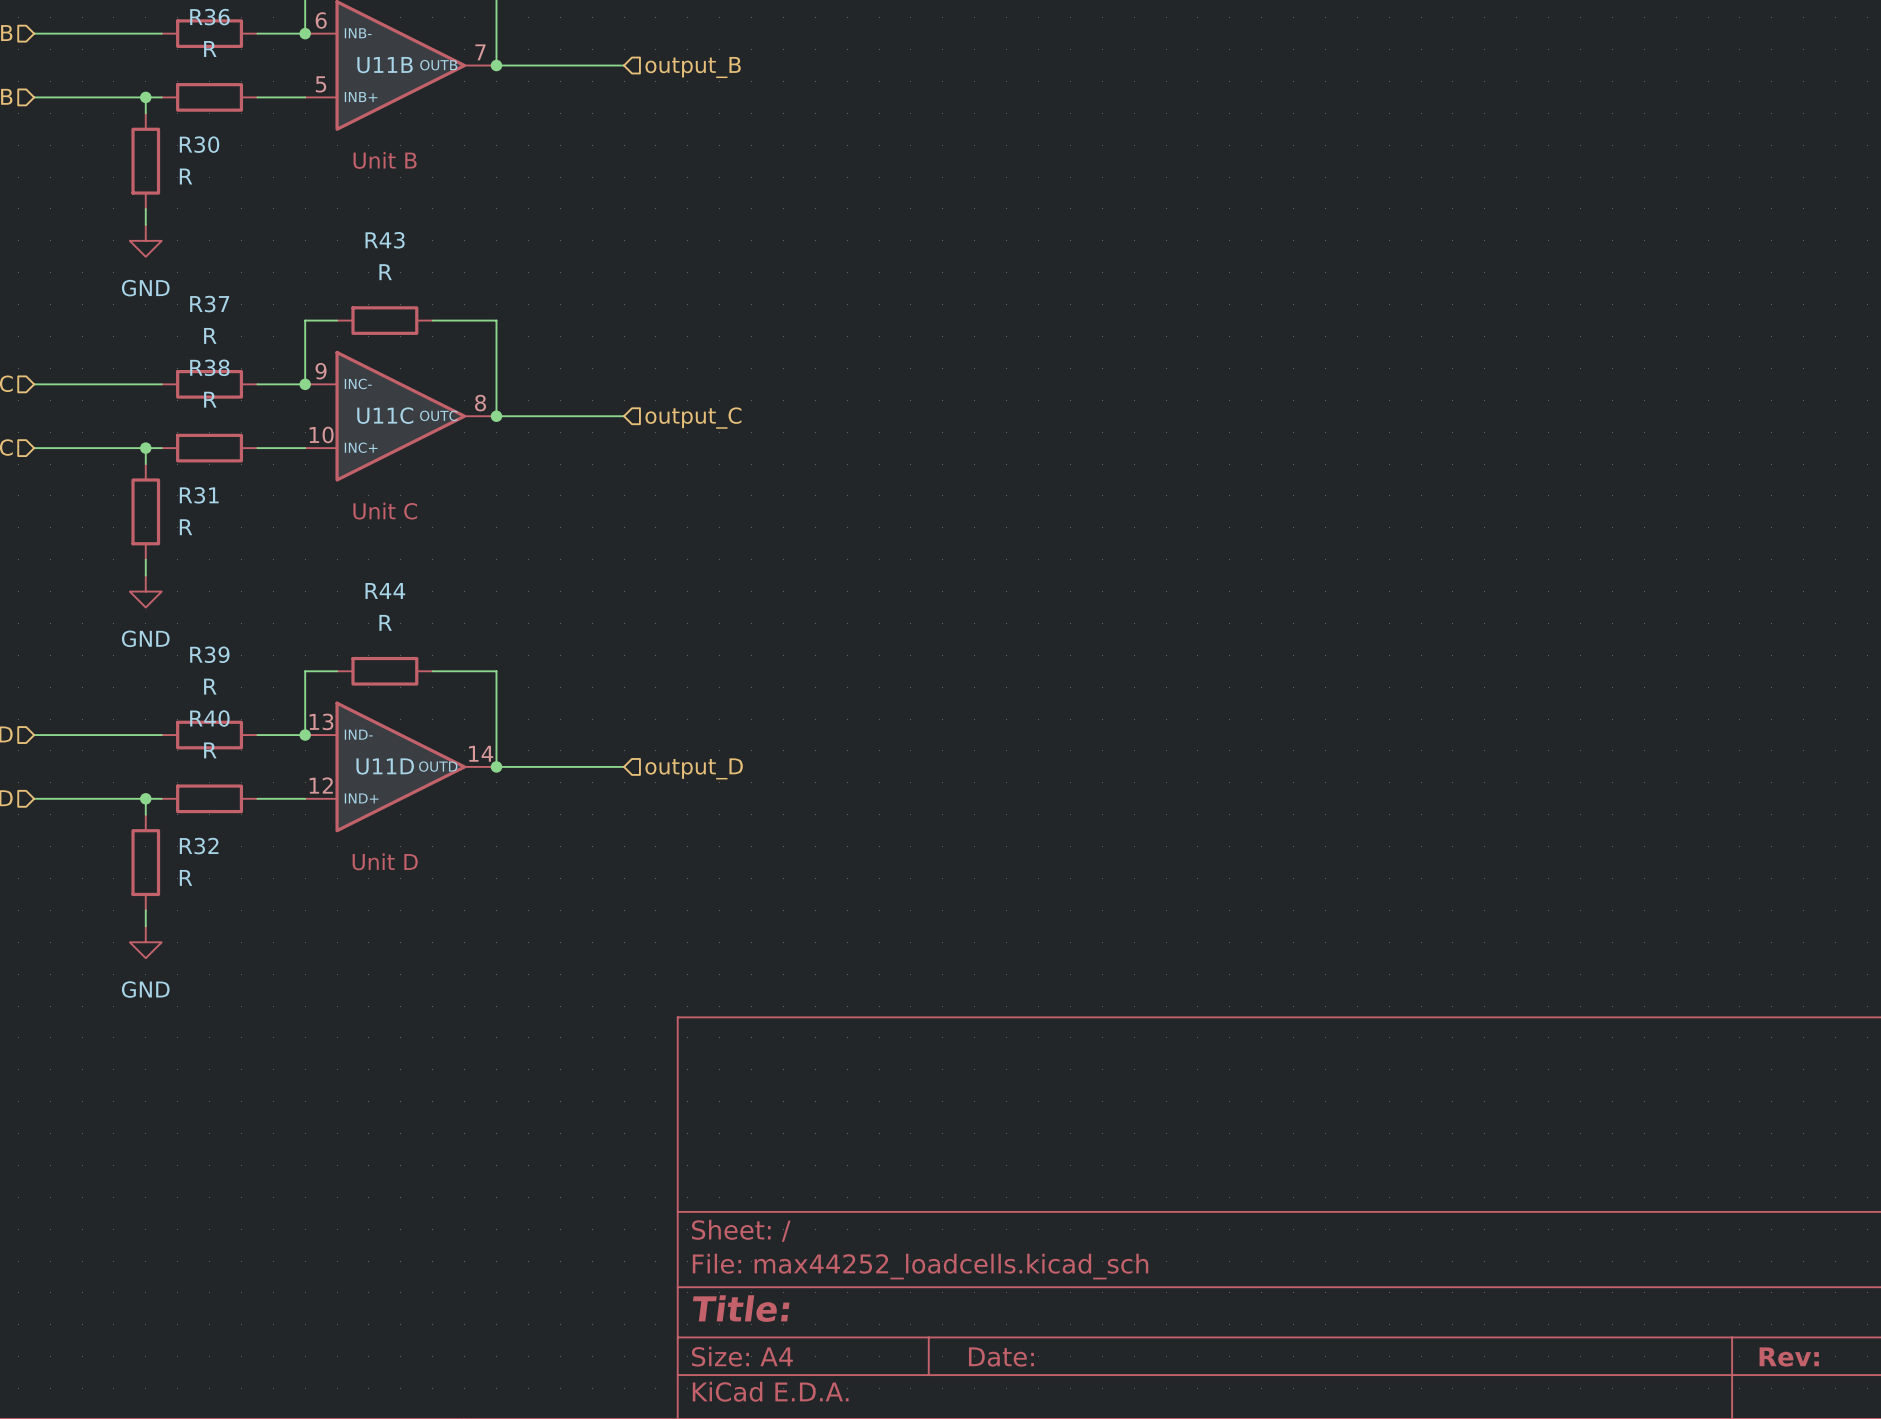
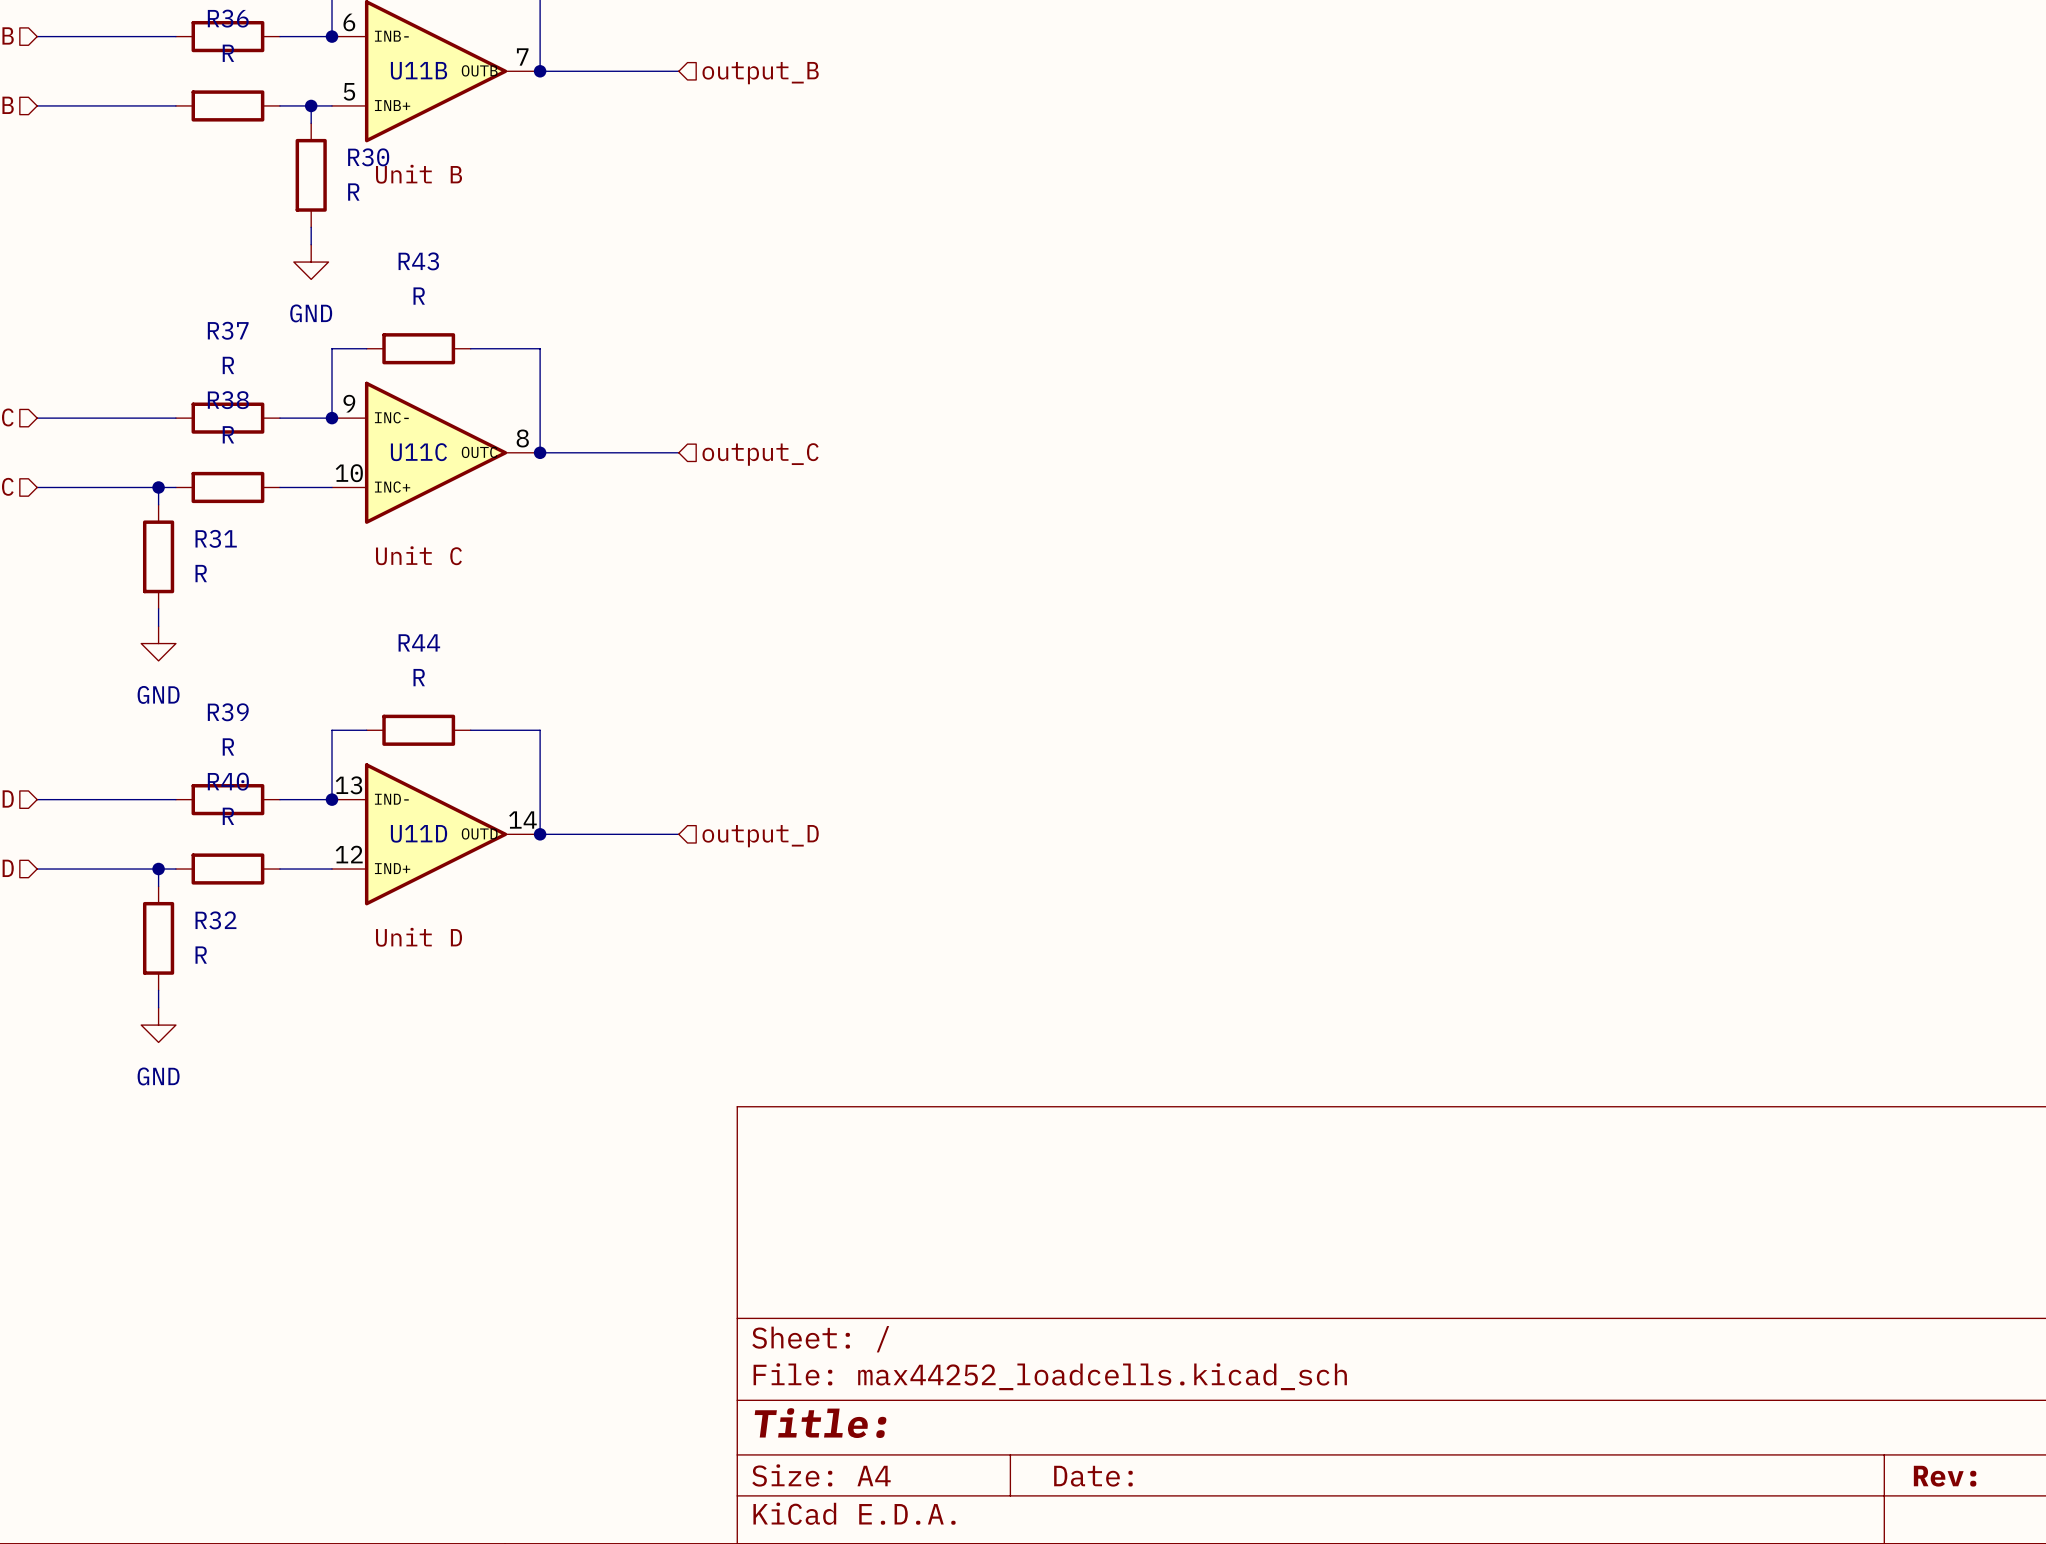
wire: (145, 97) (145, 113) -> (311, 105) (311, 123)
junction: (145, 97) -> none
junction: none -> (311, 105)
R30 position: (145, 161) -> (311, 175)
wire: (145, 208) (145, 224) -> (311, 227) (311, 244)
power symbol position: GND (145, 240) -> GND (311, 262)

